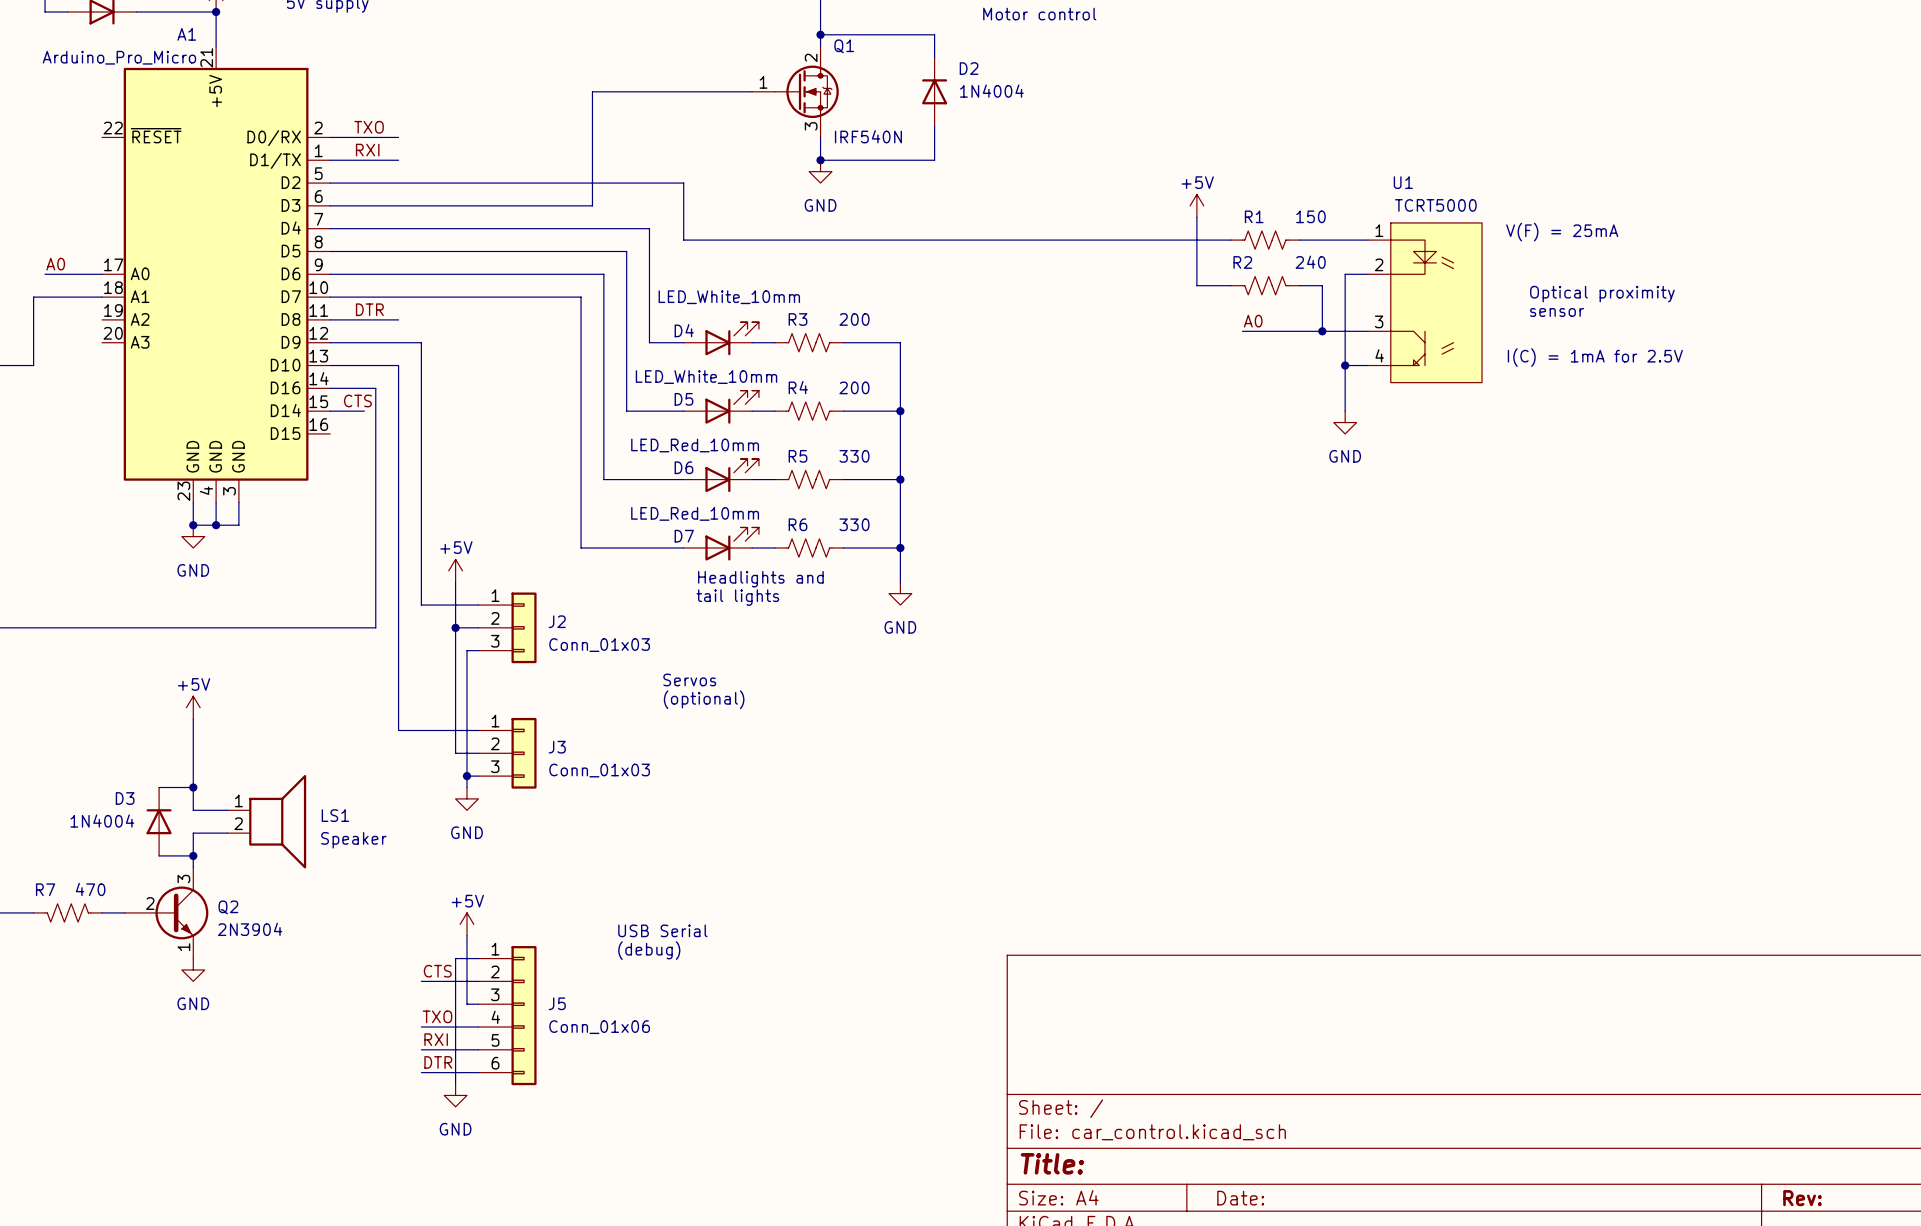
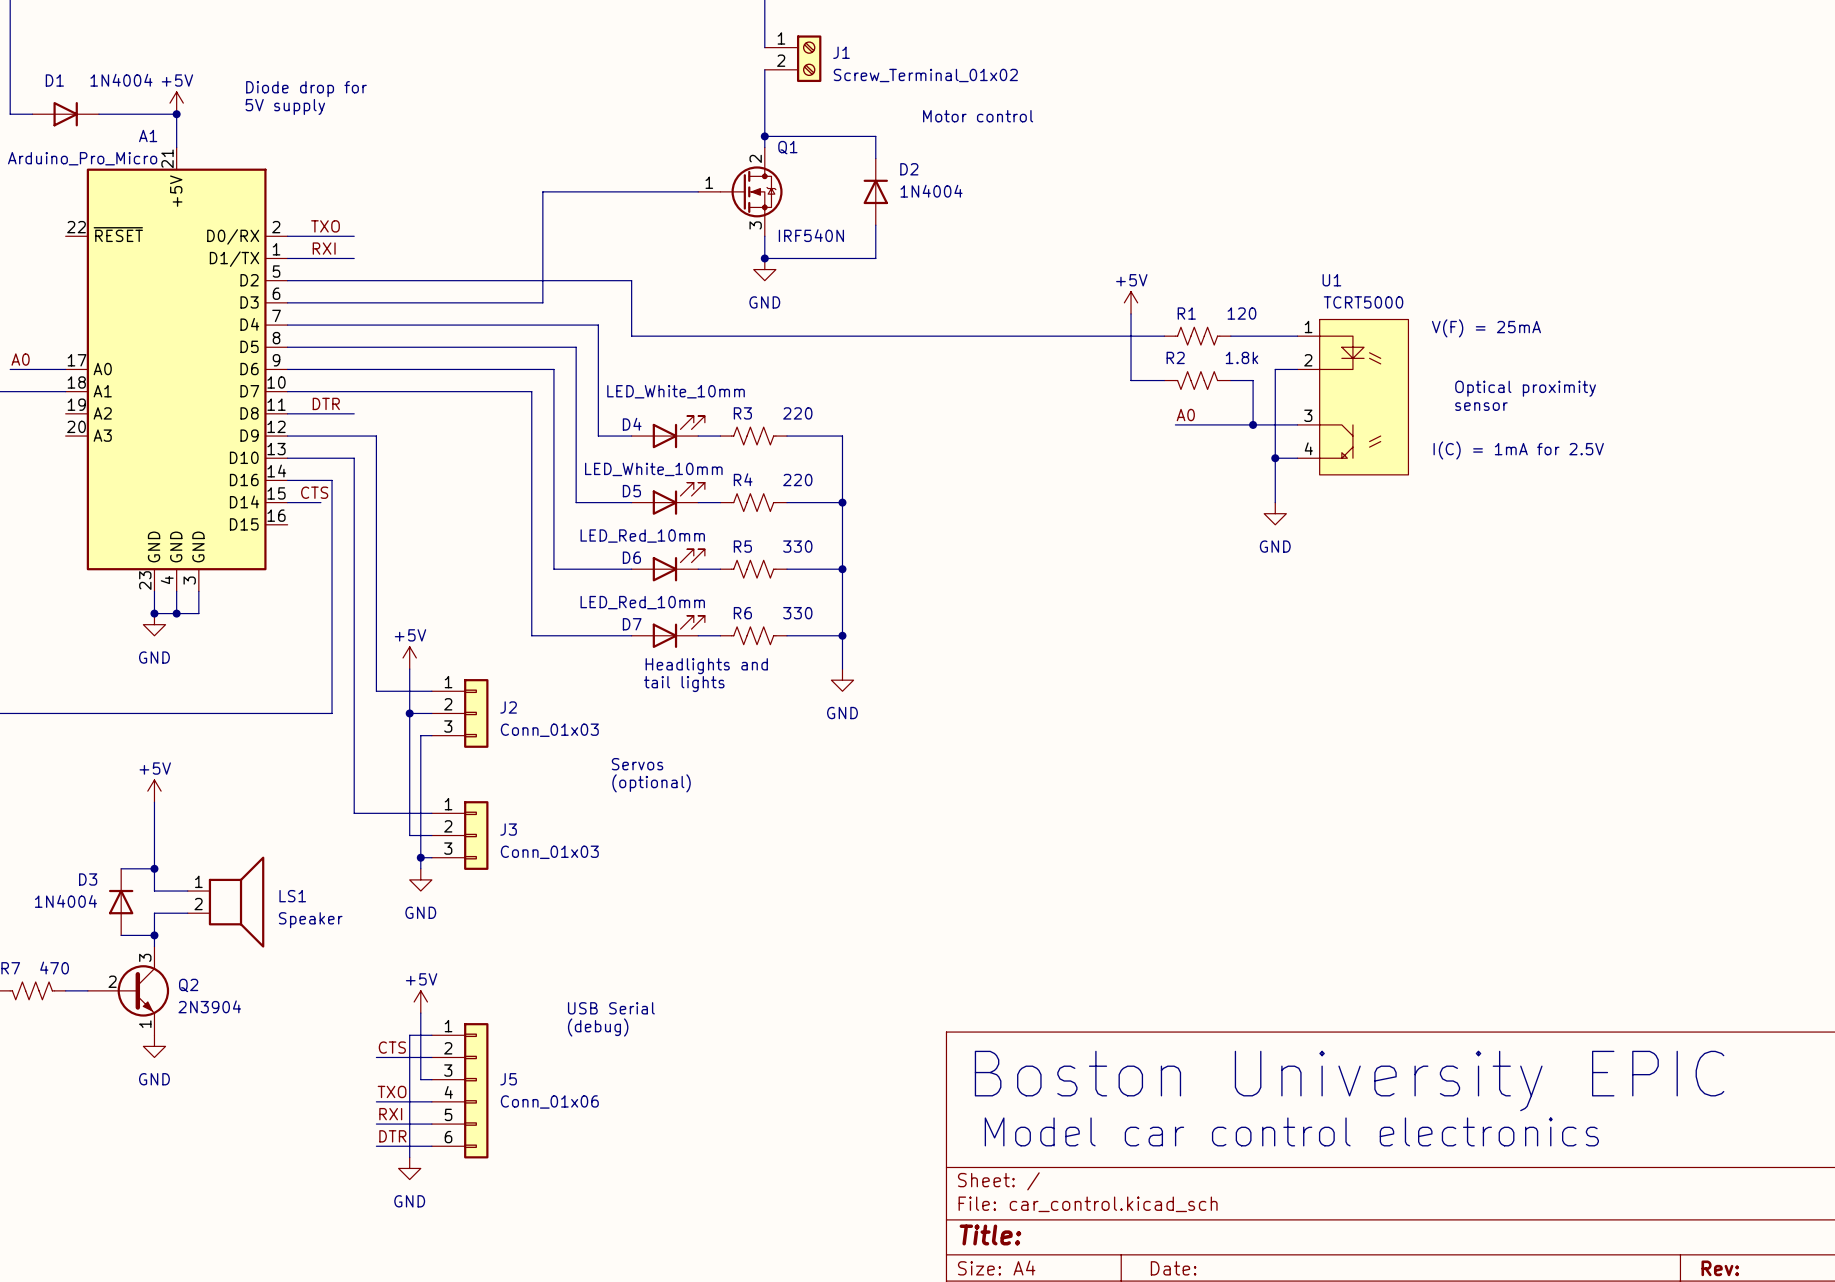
R1 value: 150 (1310, 216) -> 120 (1241, 313)
R2 value: 240 (1310, 262) -> 1.8k (1241, 357)
R3 value: 200 (854, 319) -> 220 (797, 413)
R4 value: 200 (854, 387) -> 220 (797, 480)
text: none -> Boston University EPIC (1349, 1081)
text: none -> Model car control electronics (1291, 1131)

